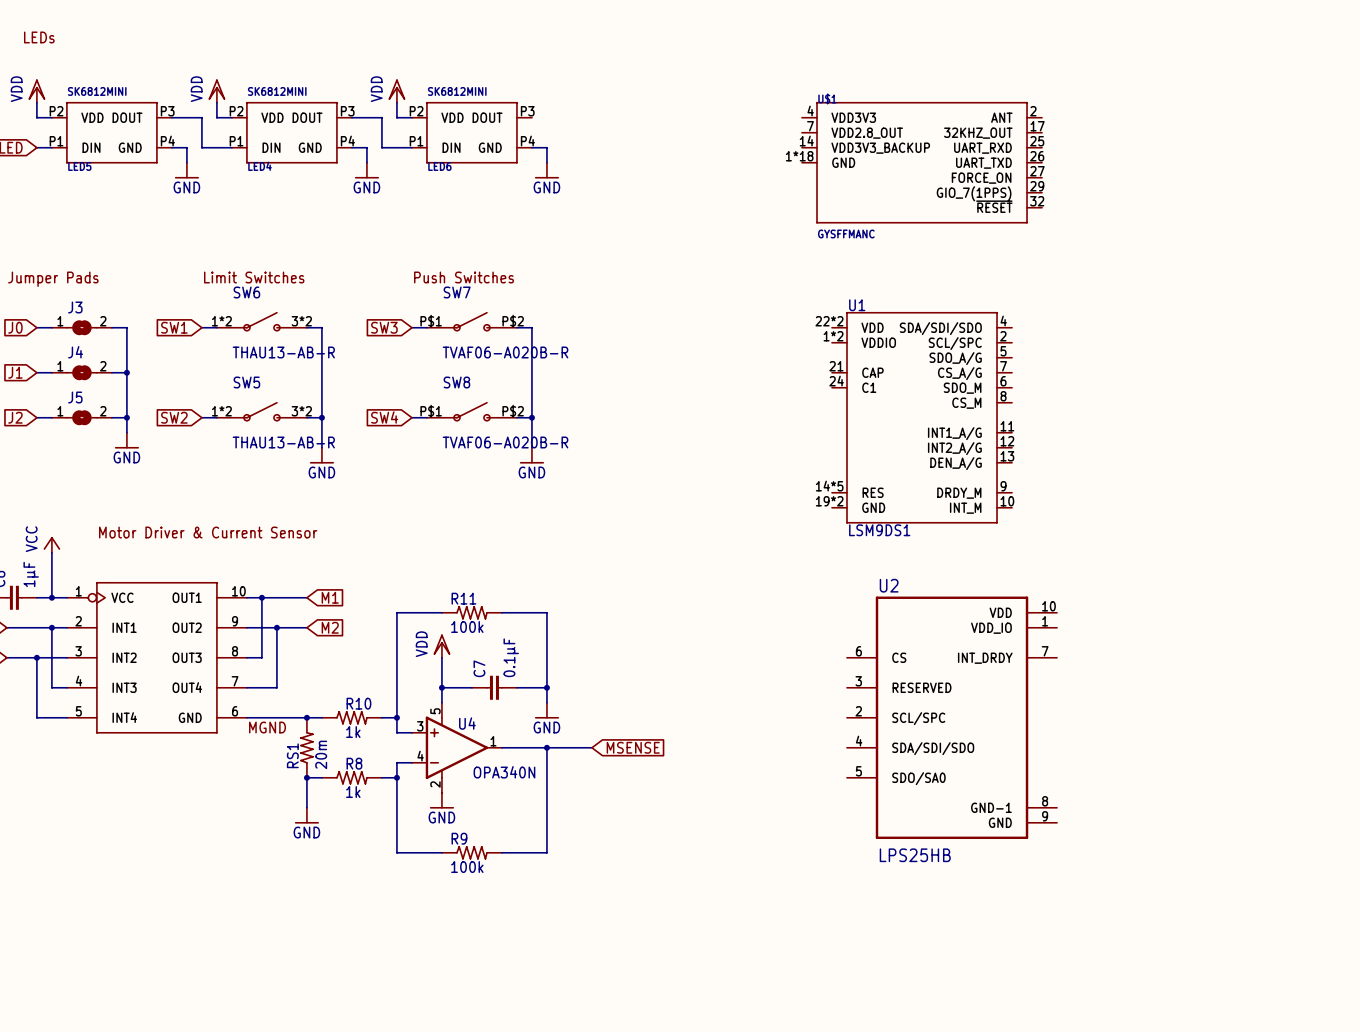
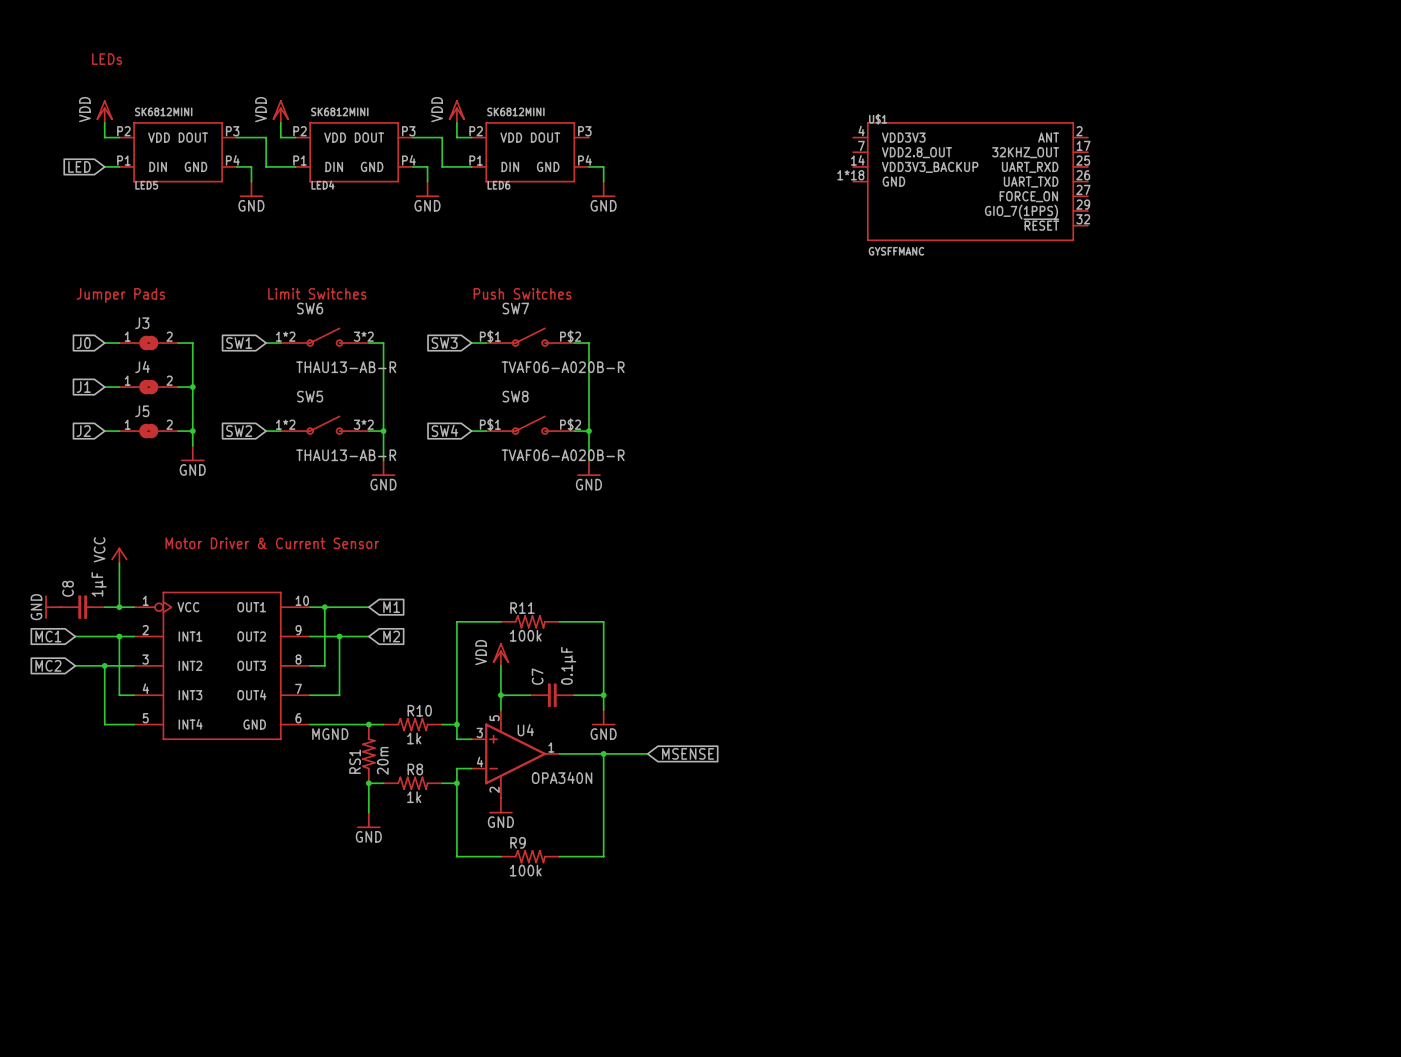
U1: LSM9DS1 (922, 417) -> none
U2: LPS25HB (952, 717) -> none

